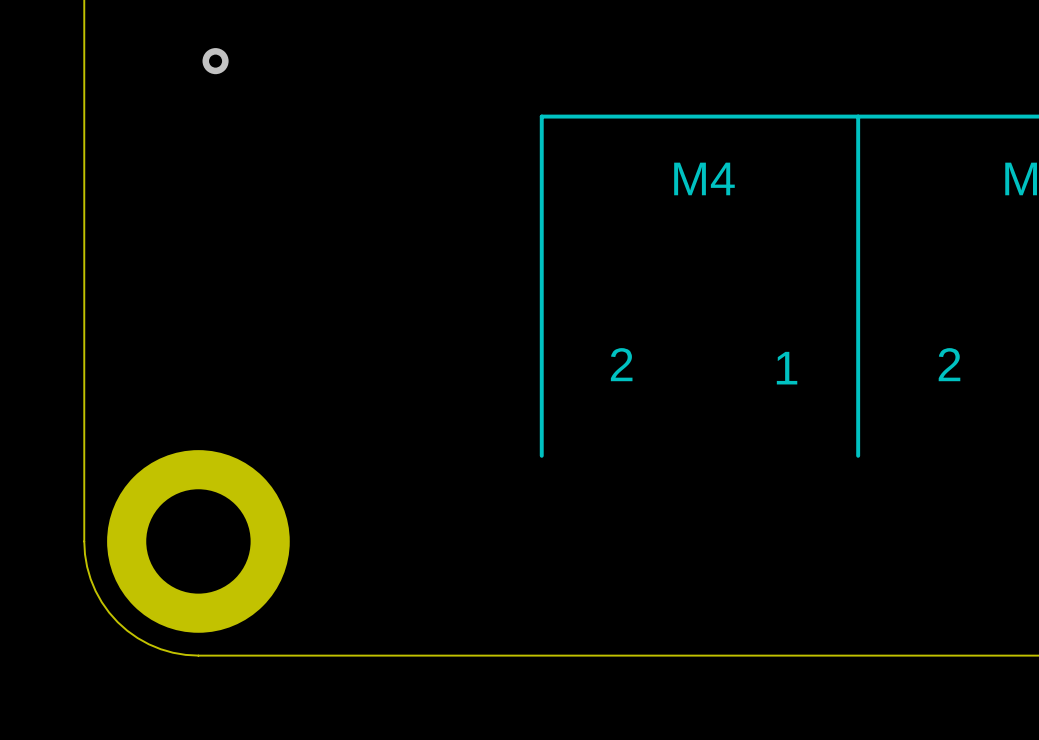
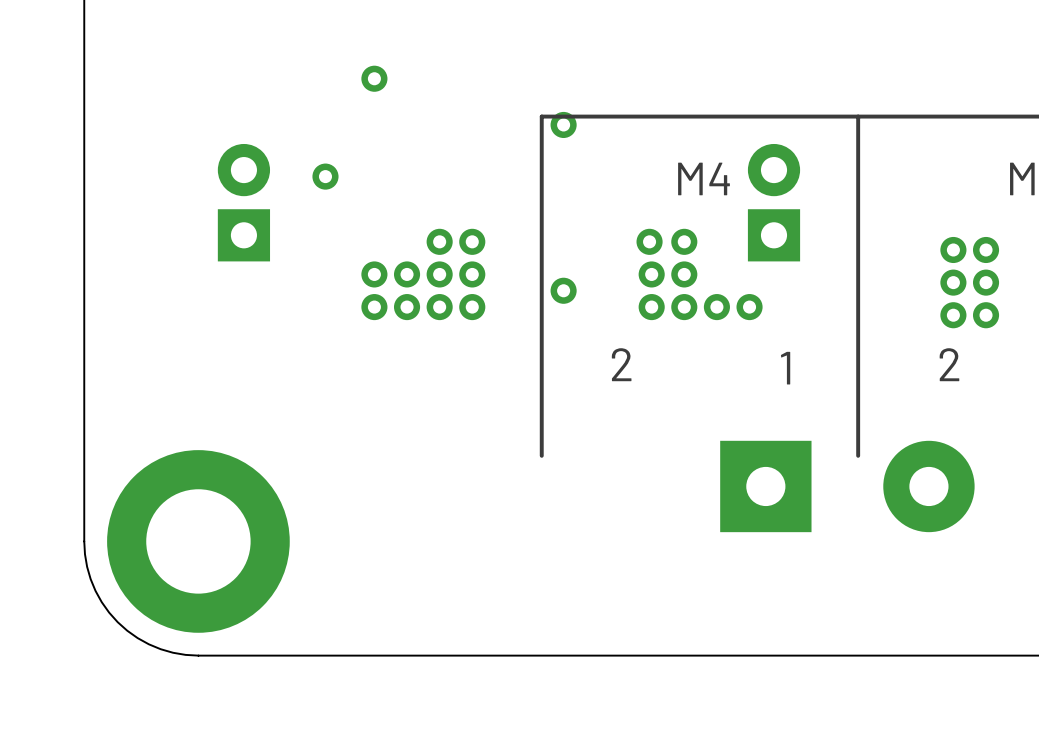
via: (215, 61) -> none
via: none -> (374, 78)
via: none -> (563, 124)
via: none -> (325, 176)
part: none -> (243, 202)
part: none -> (774, 202)
via: none -> (439, 241)
via: none -> (472, 241)
via: none -> (649, 241)
via: none -> (684, 241)
via: none -> (953, 249)
via: none -> (986, 249)
via: none -> (374, 274)
via: none -> (407, 274)
via: none -> (439, 274)
via: none -> (472, 274)
via: none -> (651, 274)
via: none -> (684, 274)
via: none -> (953, 282)
via: none -> (986, 282)
via: none -> (563, 290)
via: none -> (374, 307)
via: none -> (407, 307)
via: none -> (439, 307)
via: none -> (472, 307)
via: none -> (651, 307)
via: none -> (684, 307)
via: none -> (716, 307)
via: none -> (749, 307)
via: none -> (953, 315)
via: none -> (986, 315)
part: none -> (847, 486)

